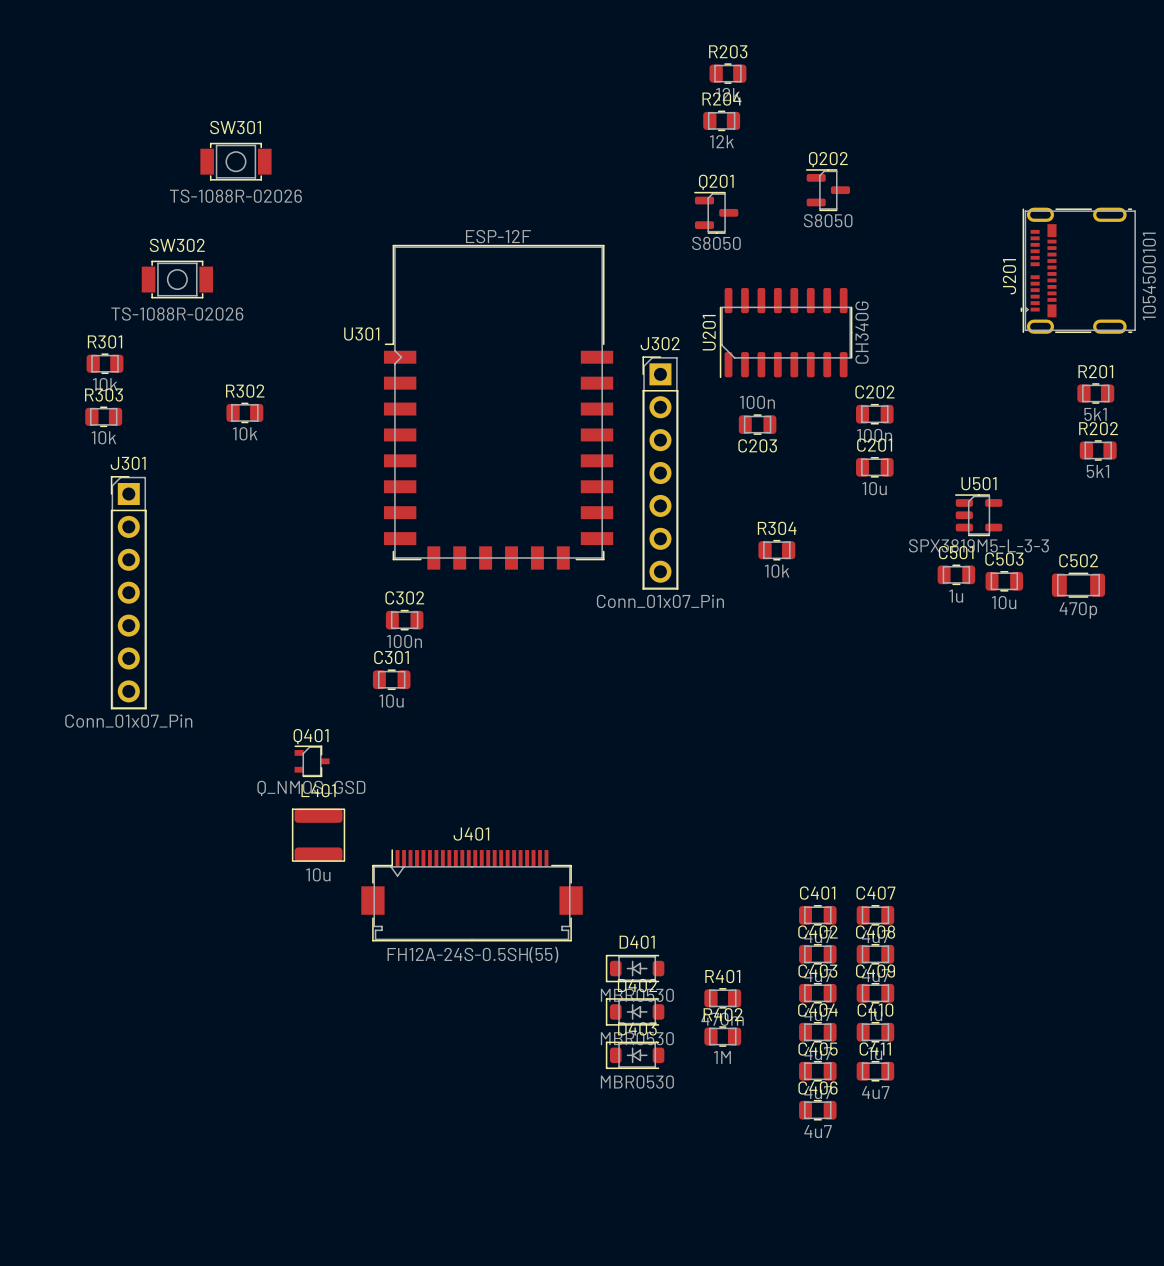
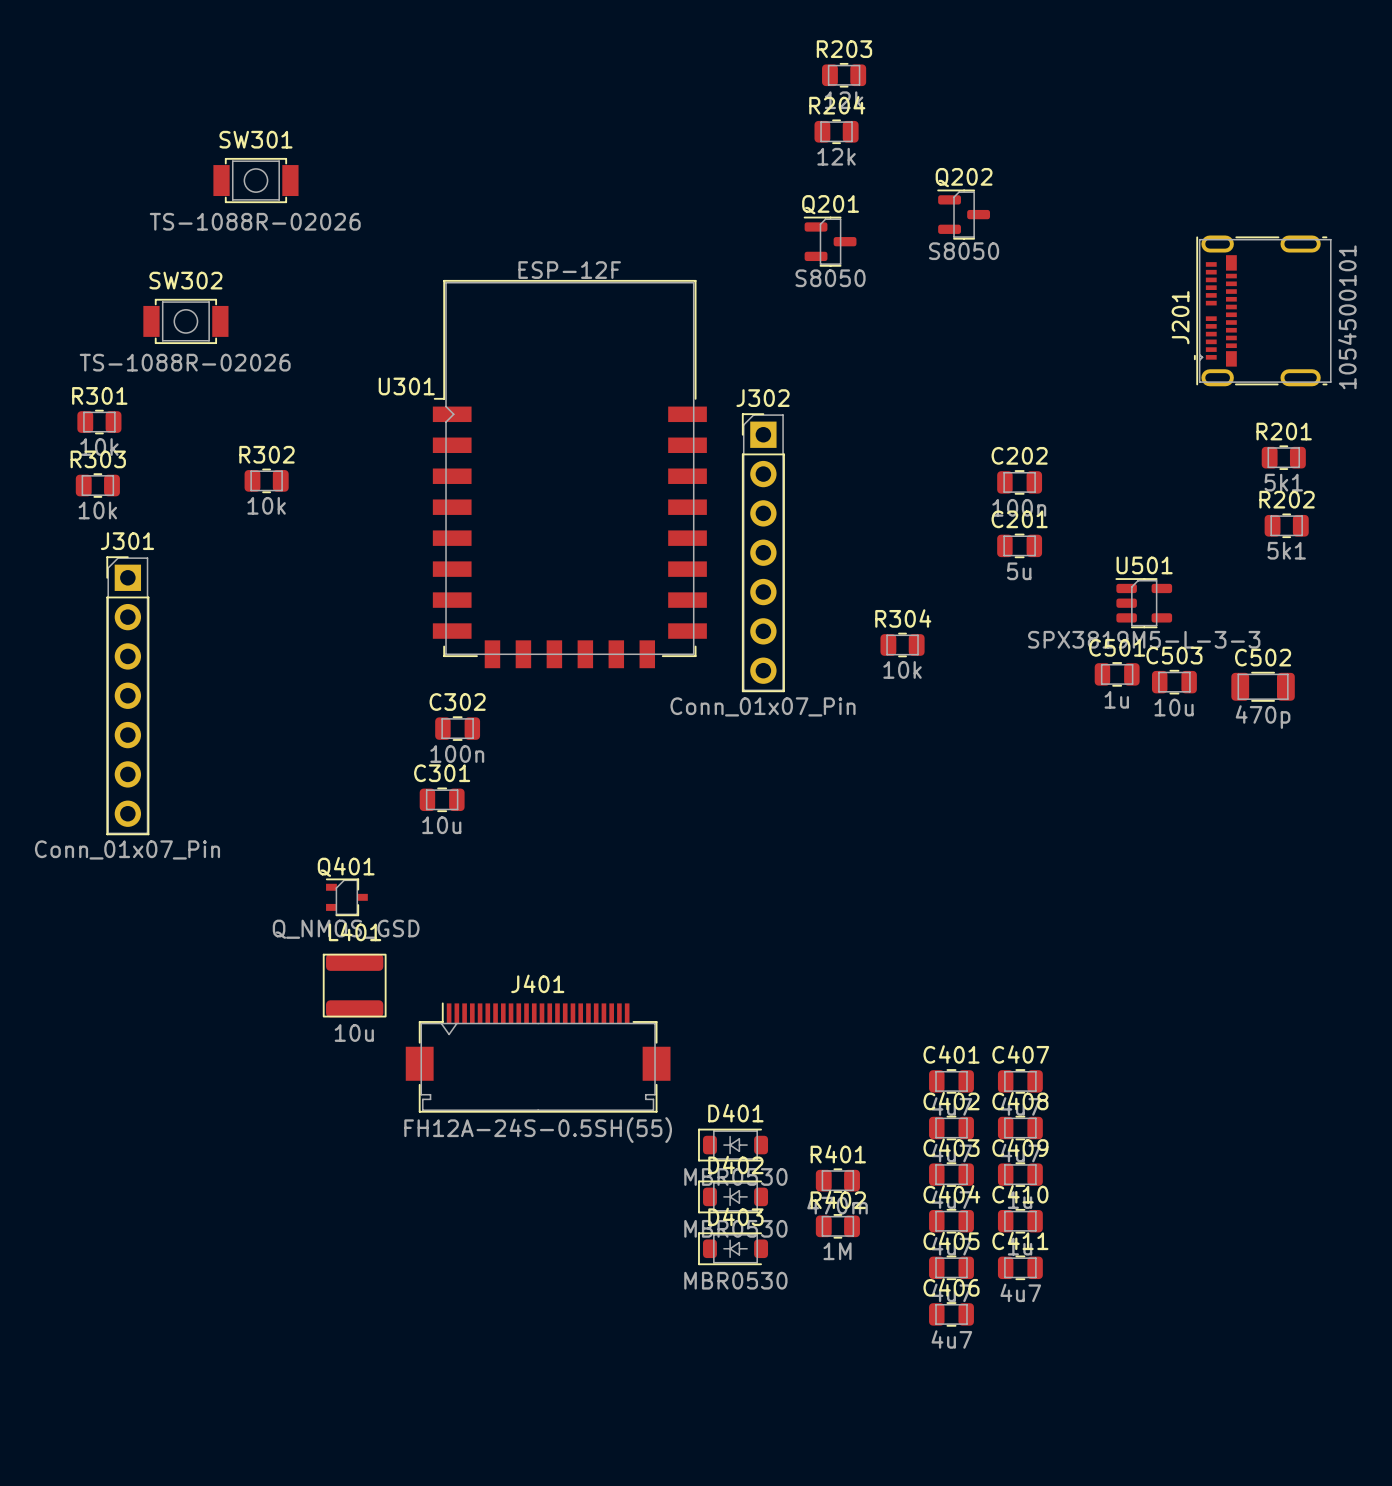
U201: CH340G (786, 333) -> none
C203: 100n (757, 424) -> none
C201 value: 10u (874, 488) -> 5u (1019, 571)

